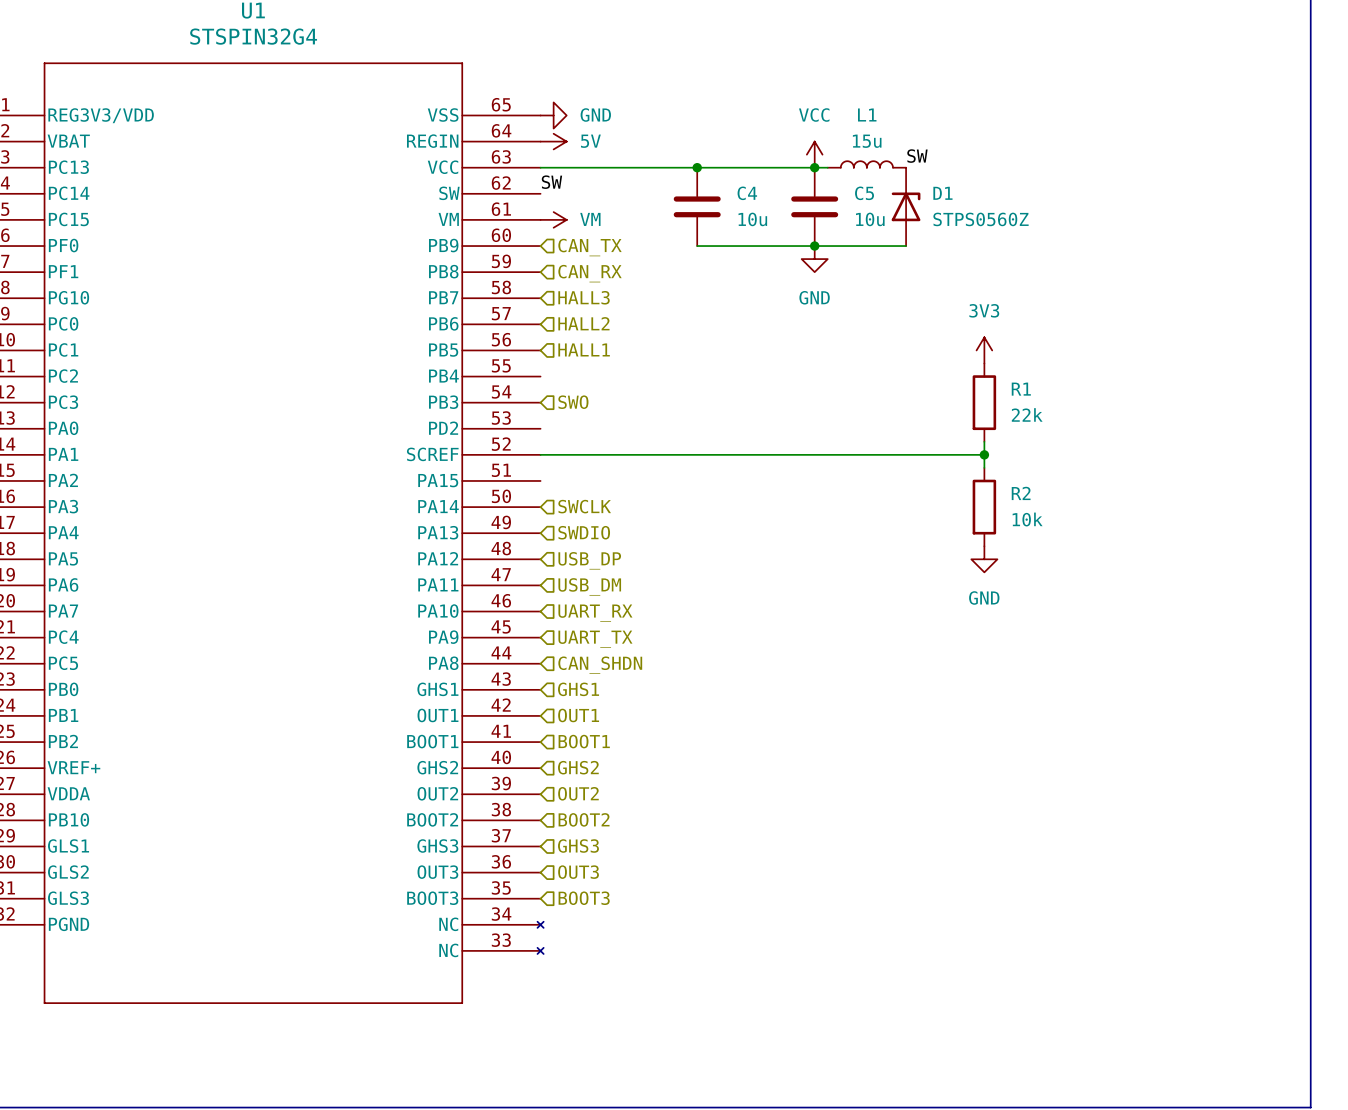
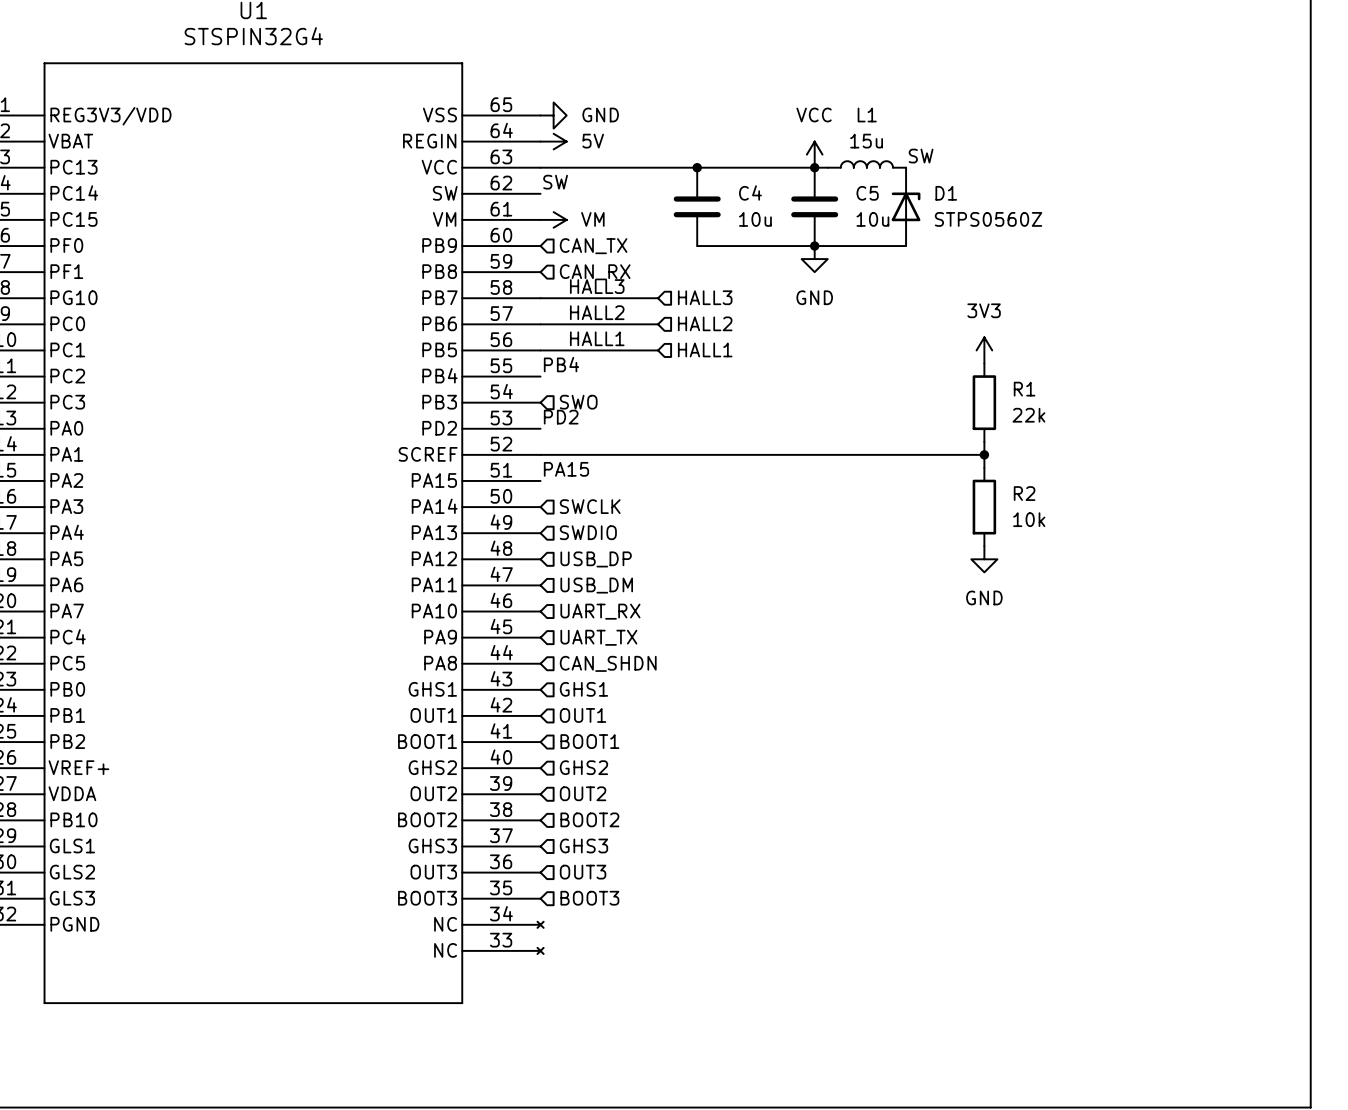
label: none -> HALL3 (597, 286)
hierarchical label position: HALL3 (584, 297) -> HALL3 (705, 297)
wire: none -> (540, 298) (658, 298)
label: none -> HALL2 (597, 312)
hierarchical label position: HALL2 (583, 323) -> HALL2 (705, 323)
wire: none -> (540, 324) (658, 324)
label: none -> HALL1 (597, 338)
hierarchical label position: HALL1 (584, 349) -> HALL1 (705, 349)
wire: none -> (540, 350) (658, 350)
label: none -> PB4 (561, 364)
label: none -> PD2 (561, 417)
label: none -> PA15 (566, 469)

